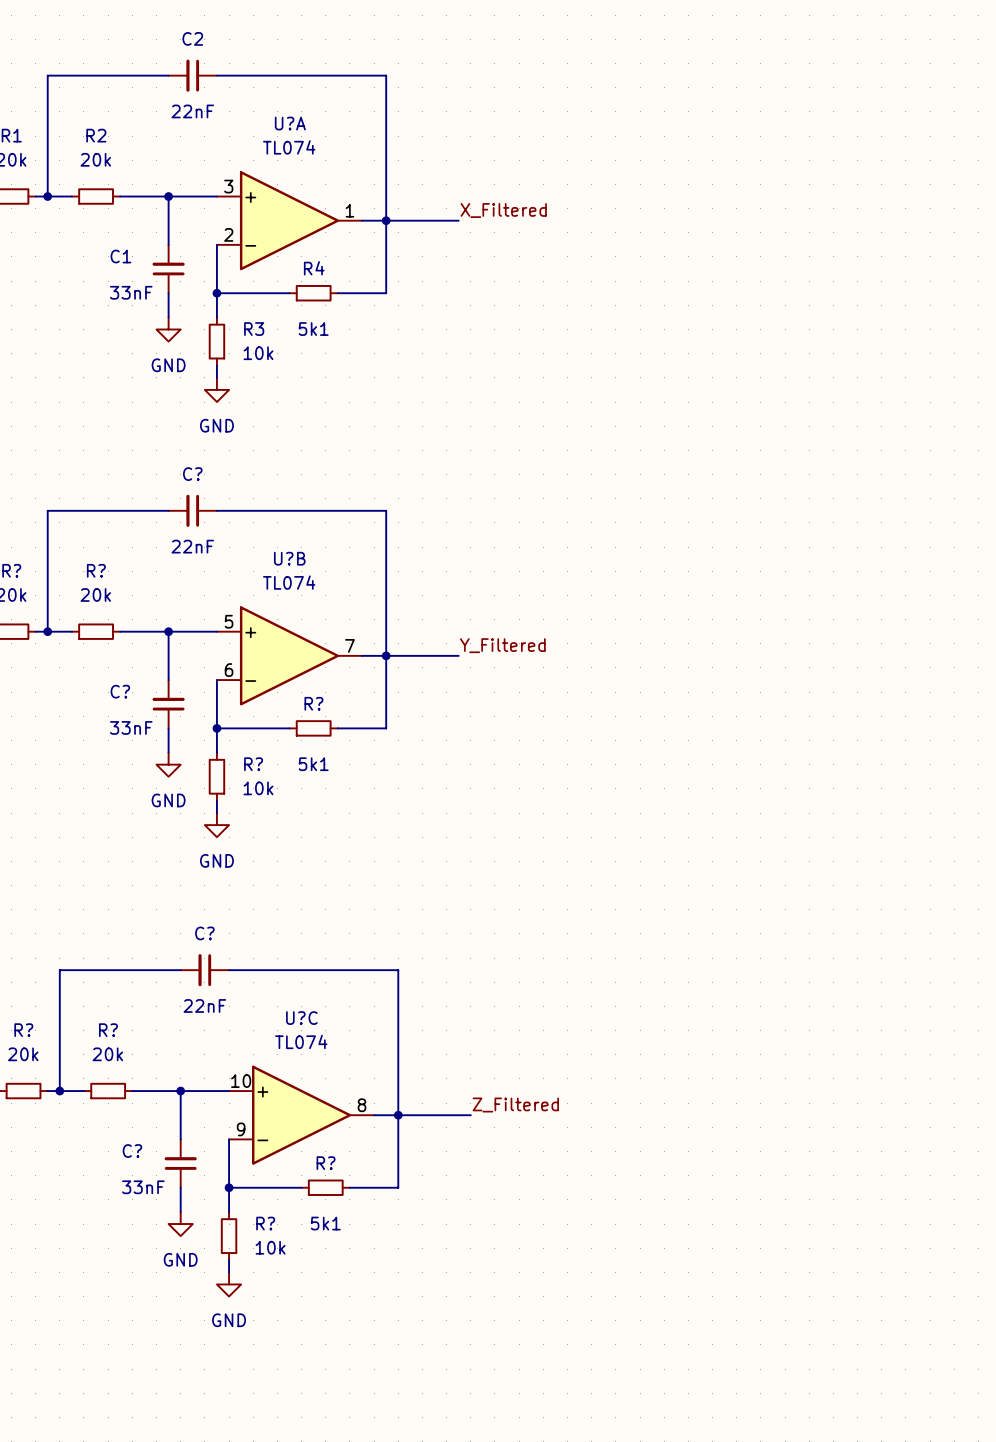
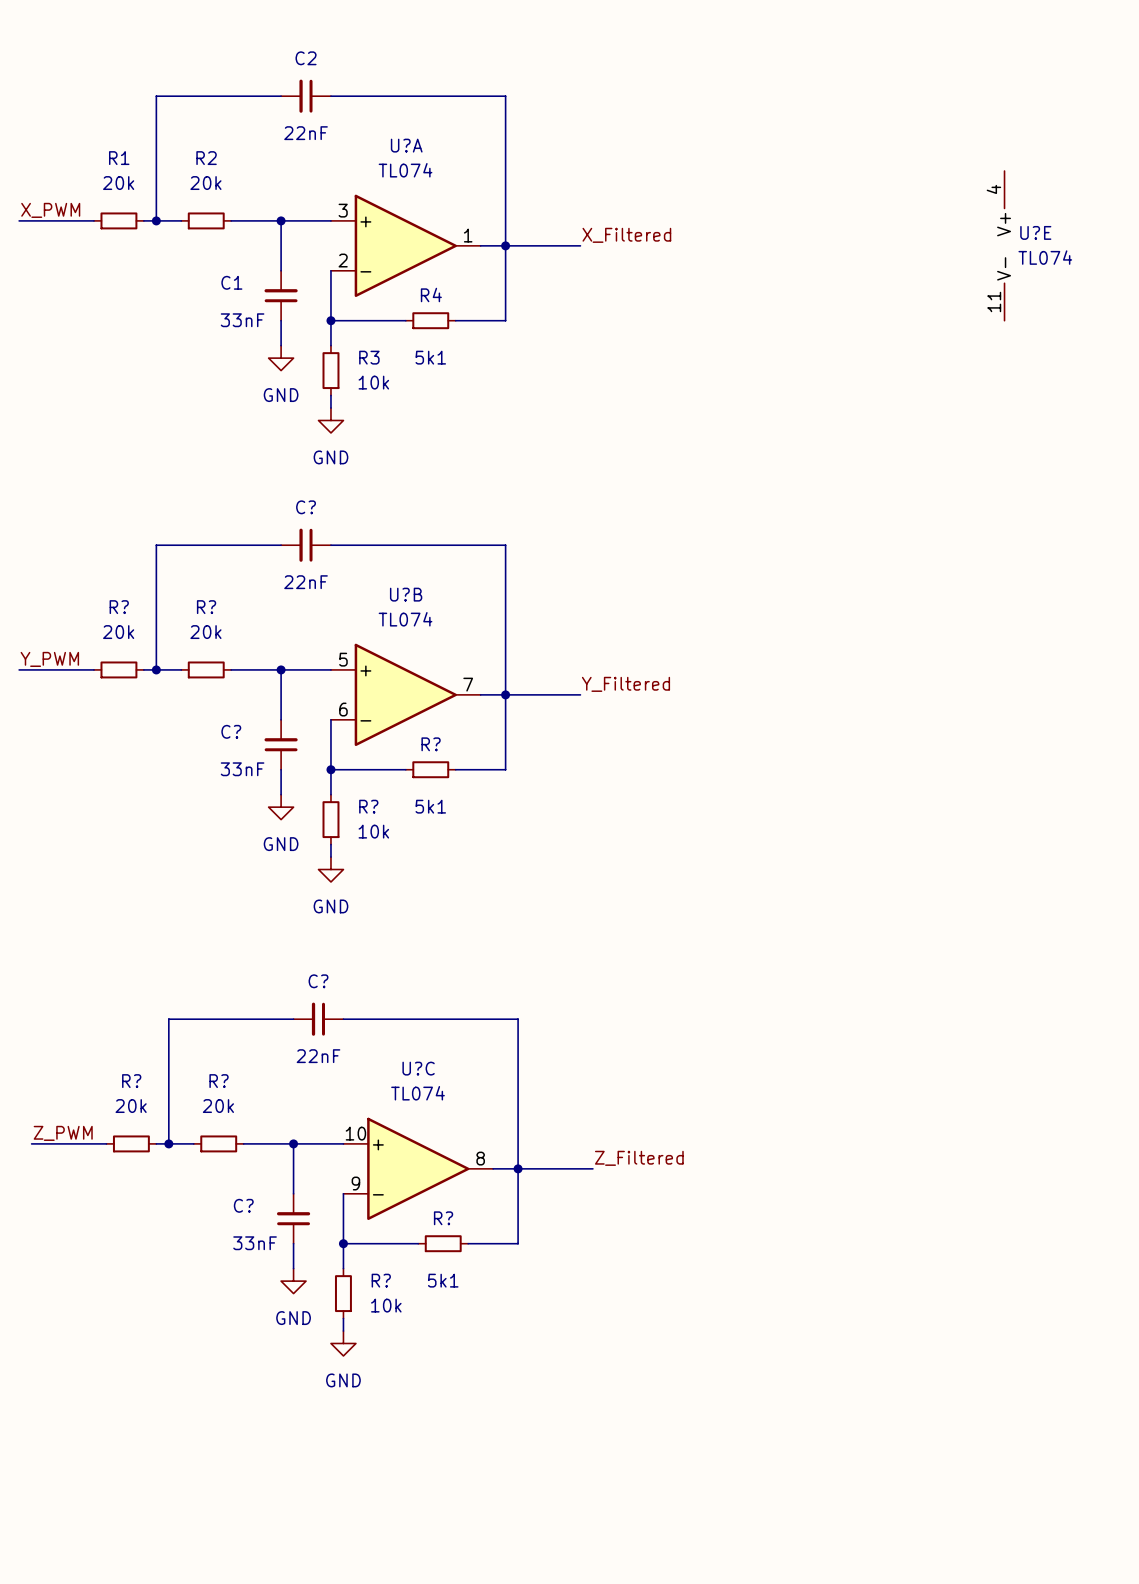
U?E: none -> TL074 (1004, 245)

